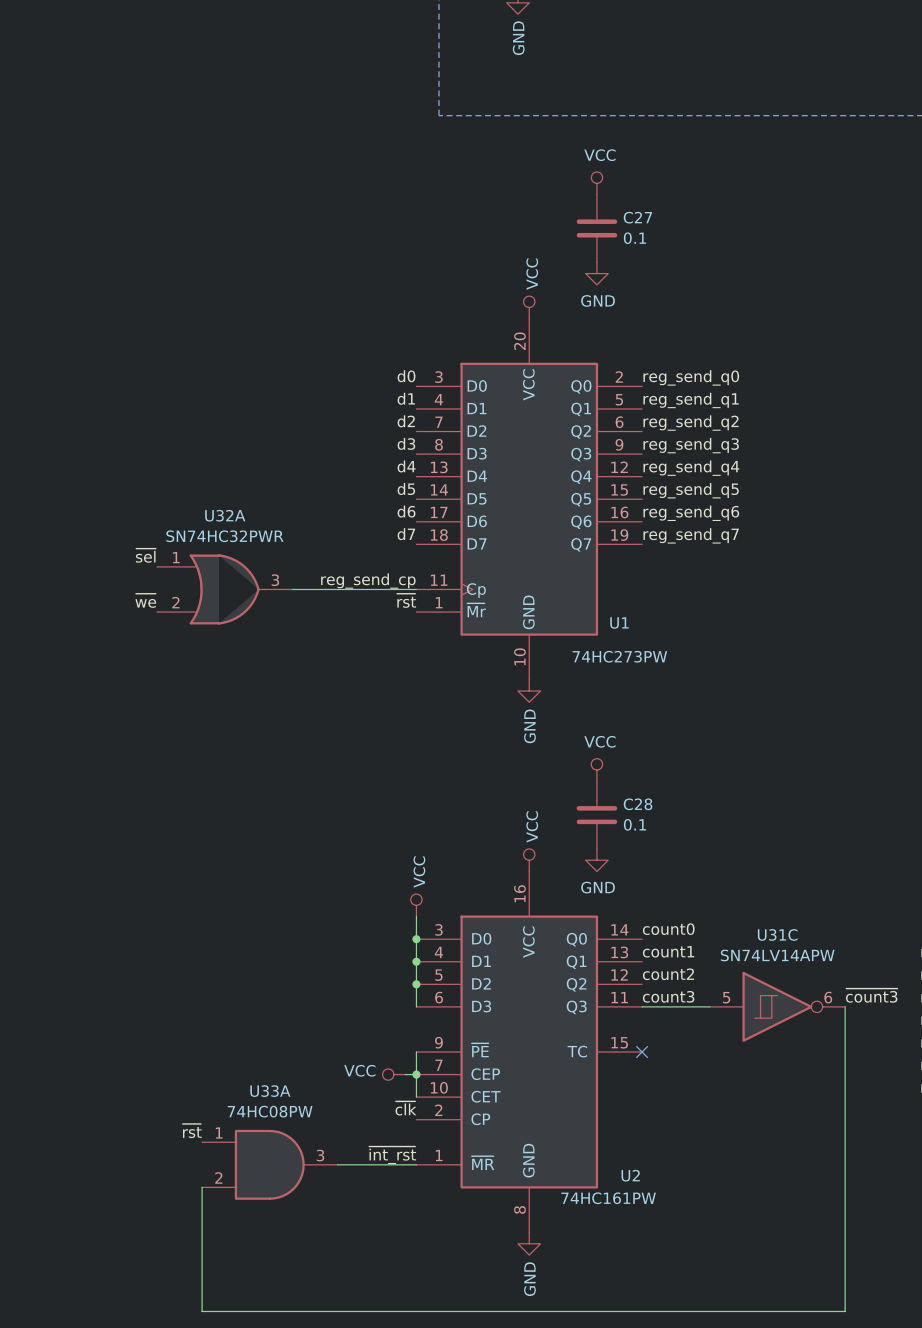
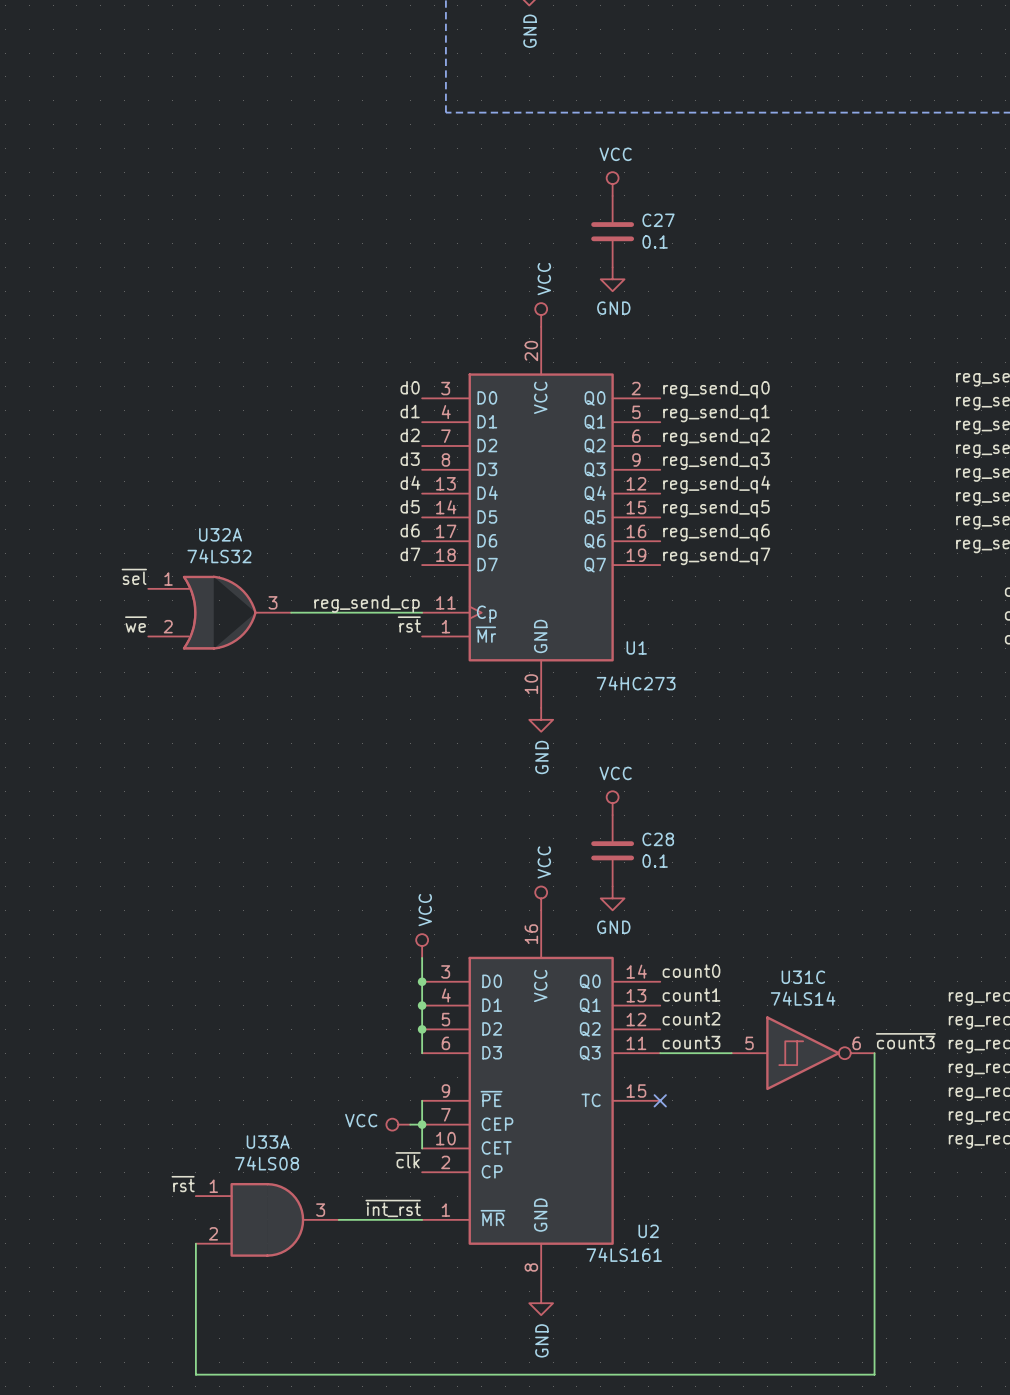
U32A value: SN74HC32PWR (224, 536) -> 74LS32 (219, 556)
U1 value: 74HC273PW (619, 656) -> 74HC273 (636, 683)
U31C value: SN74LV14APW (777, 955) -> 74LS14 (803, 998)
U33A value: 74HC08PW (270, 1111) -> 74LS08 (267, 1163)
U2 value: 74HC161PW (608, 1198) -> 74LS161 (624, 1254)

